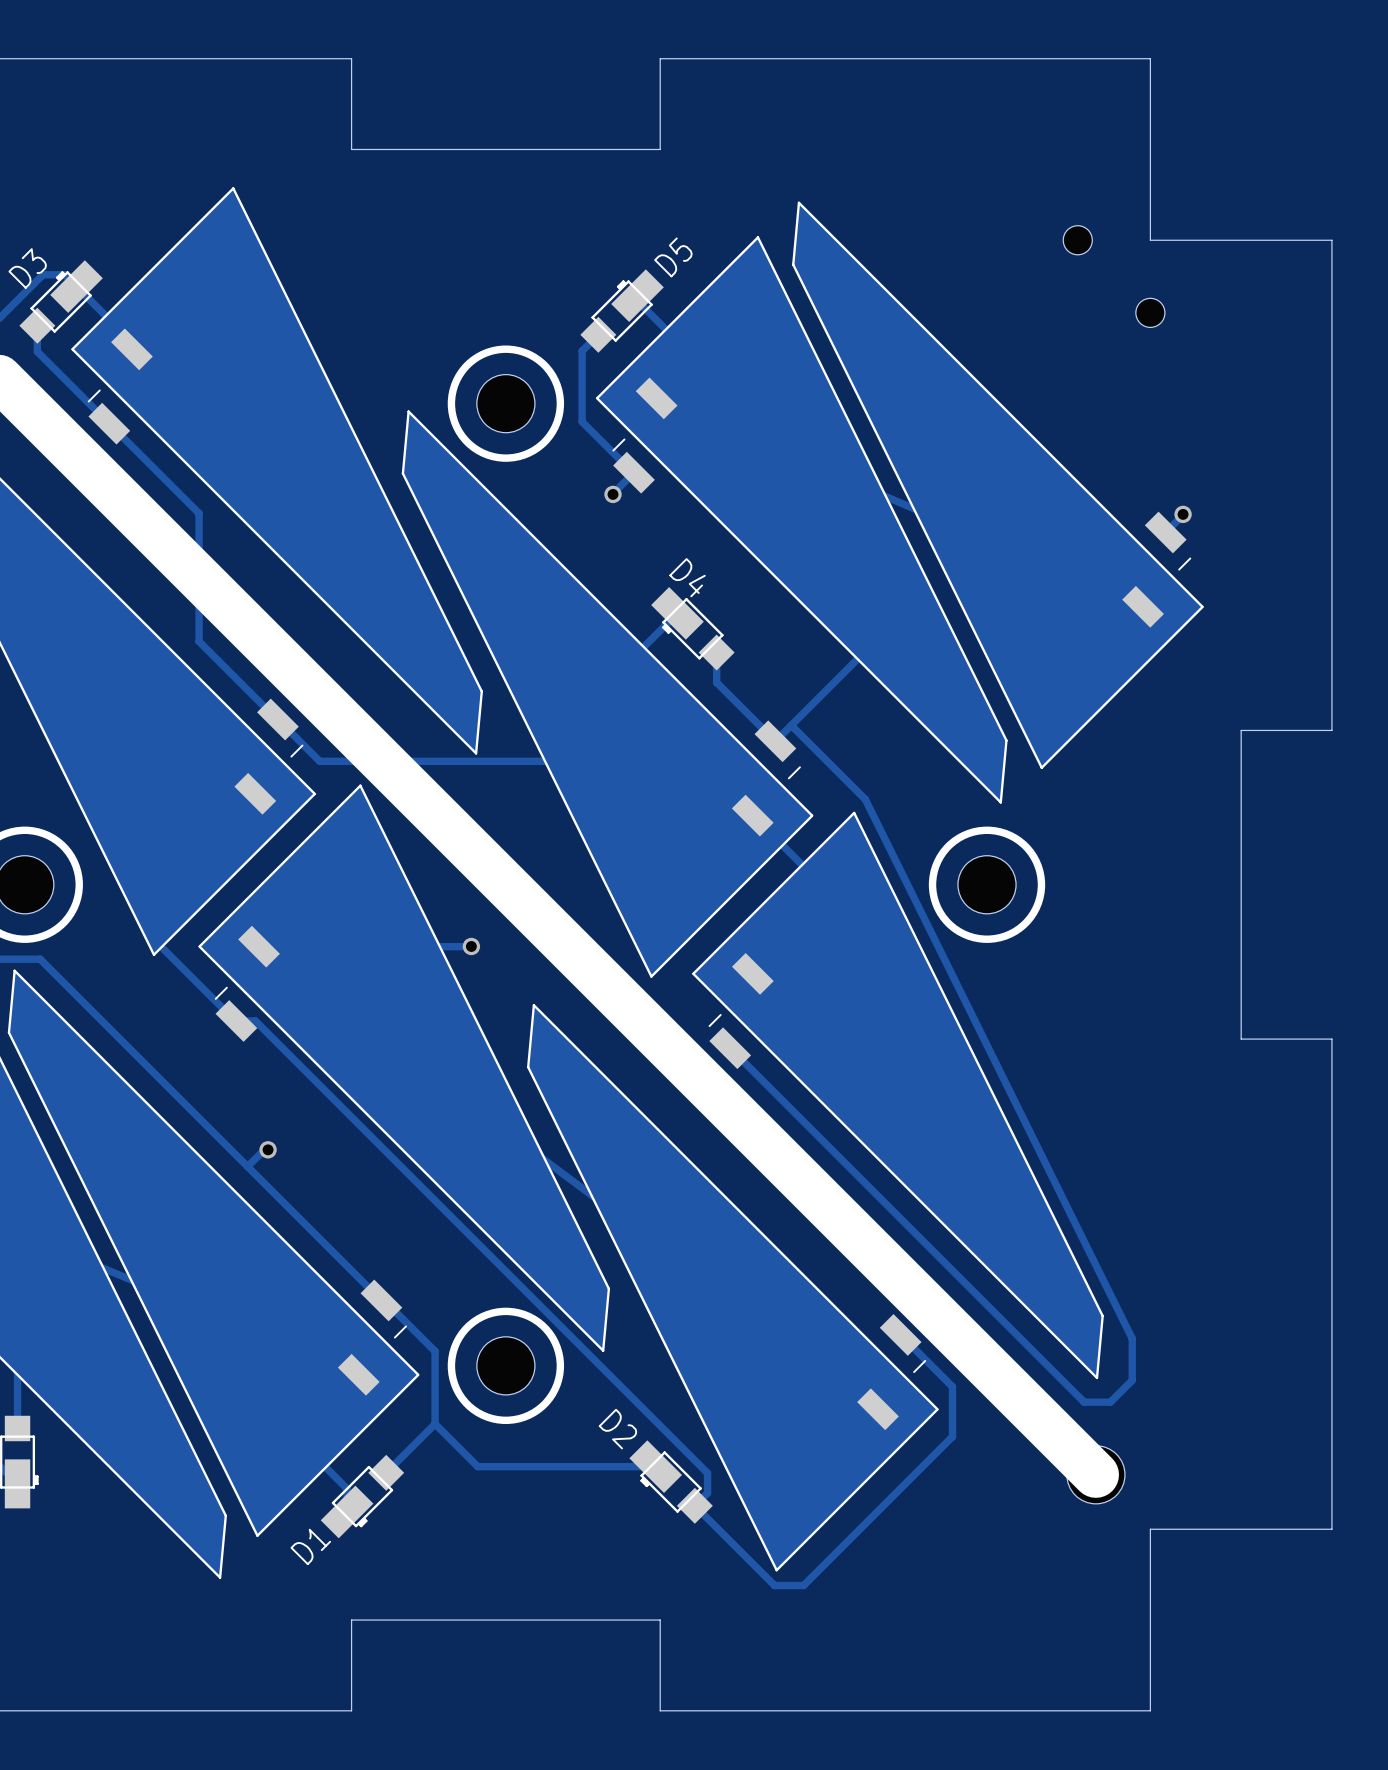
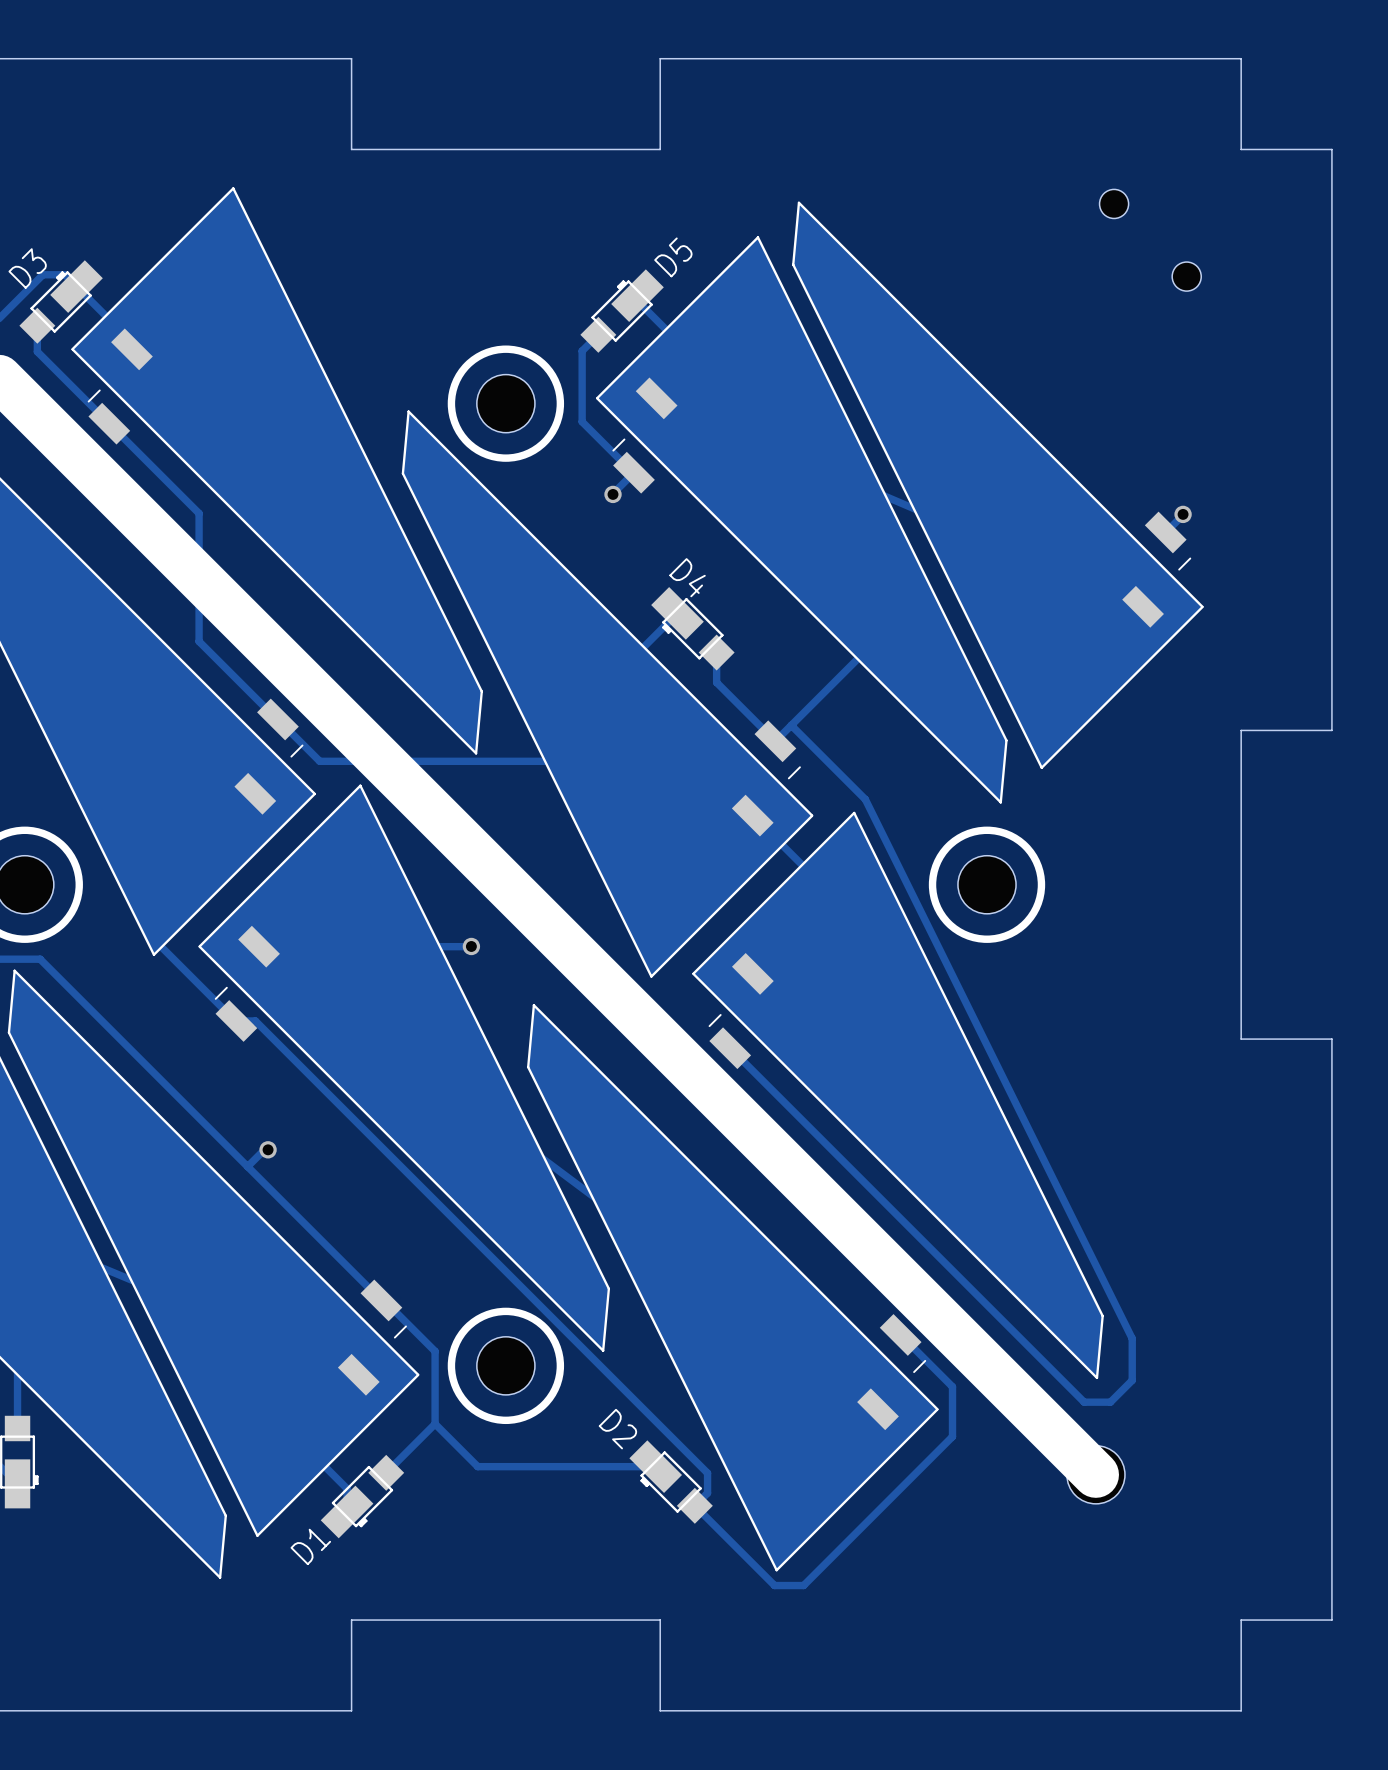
board edge: (1150, 58) (1150, 240) (1331, 240) -> (1150, 58) (1241, 58) (1241, 149) (1331, 149) (1331, 240)
hole position: (1077, 240) -> (1114, 203)
hole position: (1150, 312) -> (1186, 276)
board edge: (1331, 1529) (1150, 1529) (1150, 1710) -> (1331, 1529) (1331, 1620) (1241, 1620) (1241, 1710) (1150, 1710)

